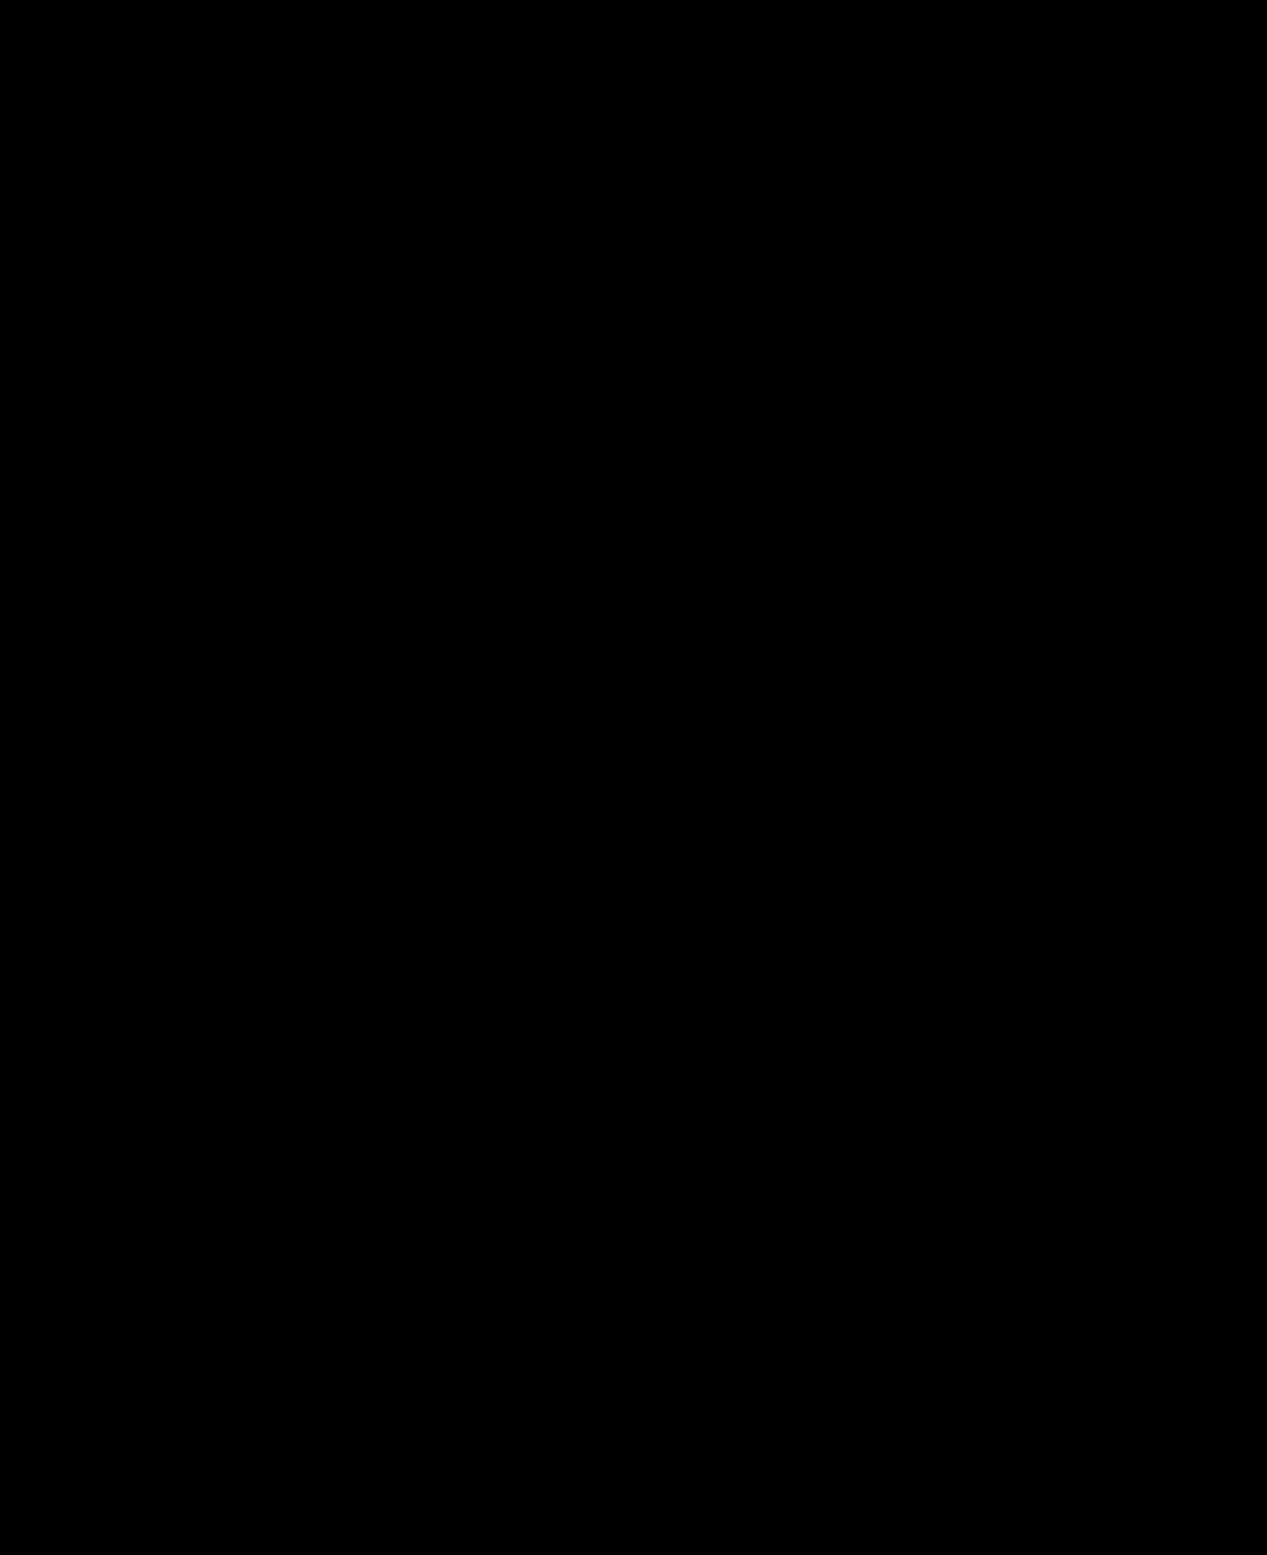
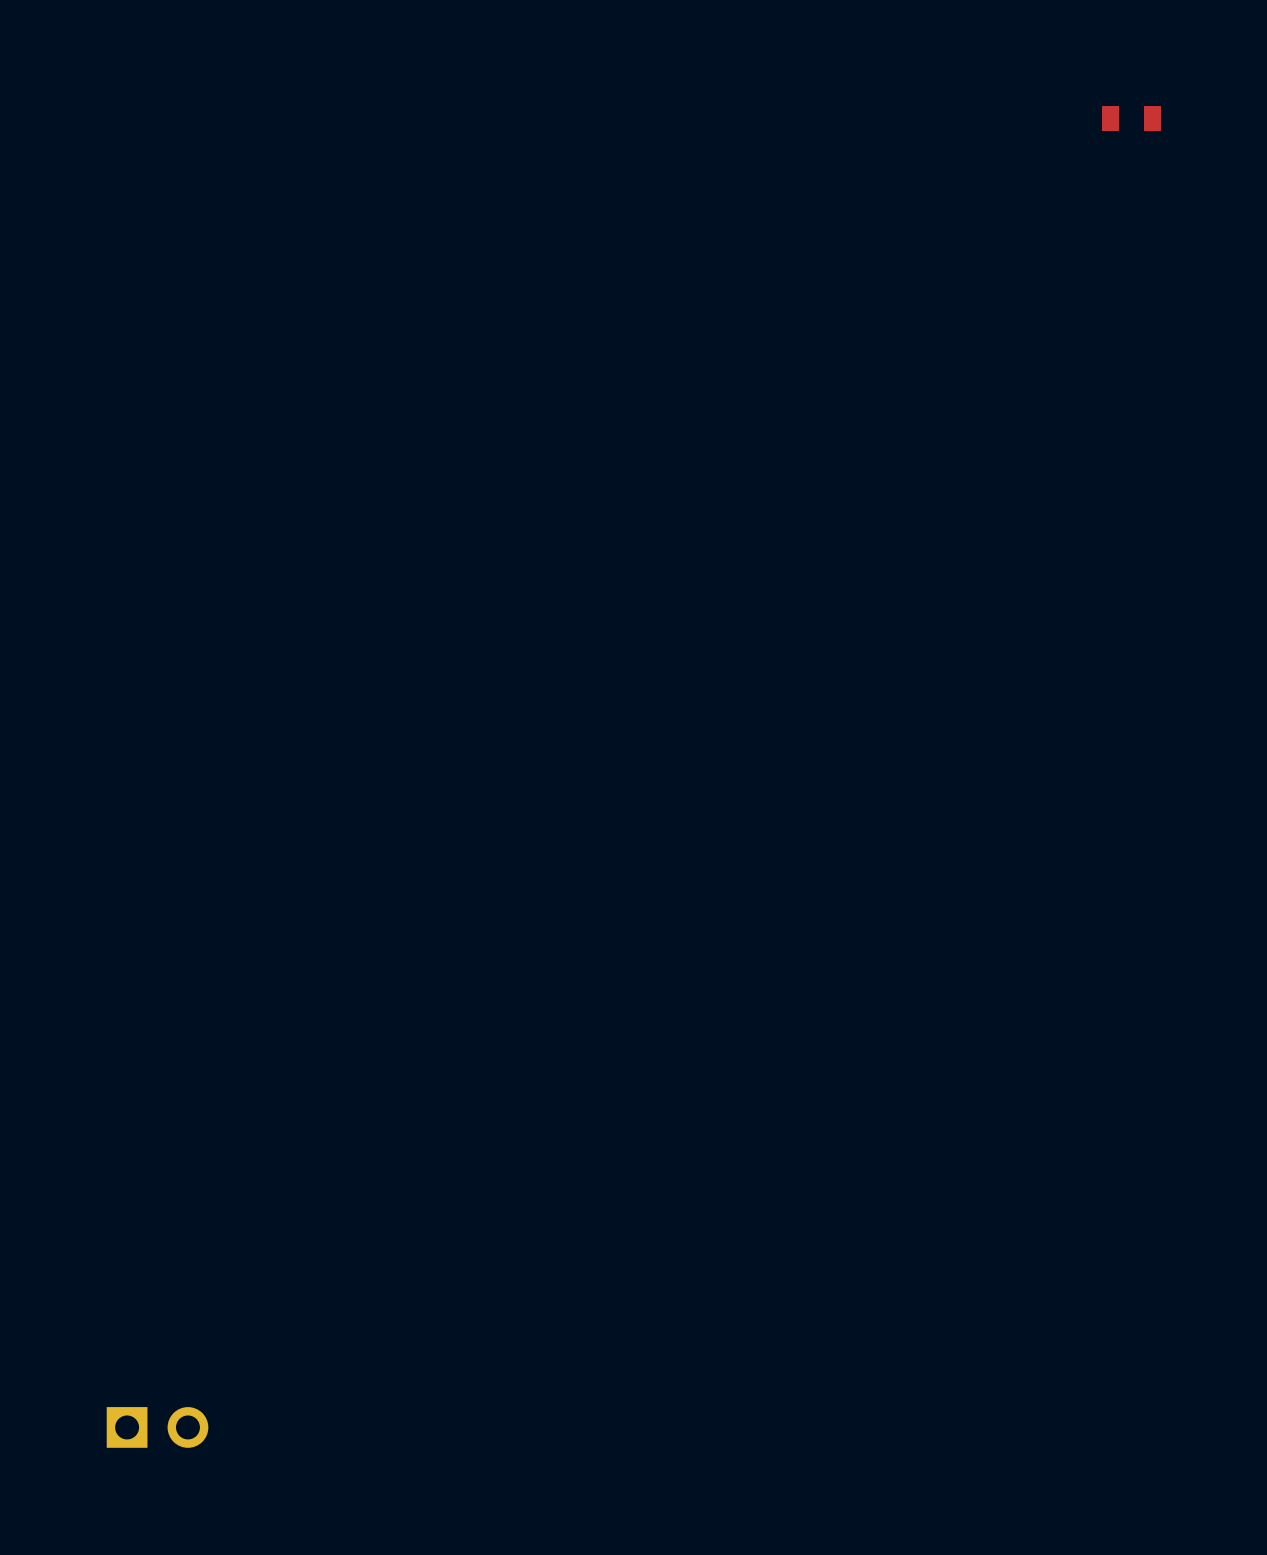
part: none -> (1131, 118)
part: none -> (157, 1427)

